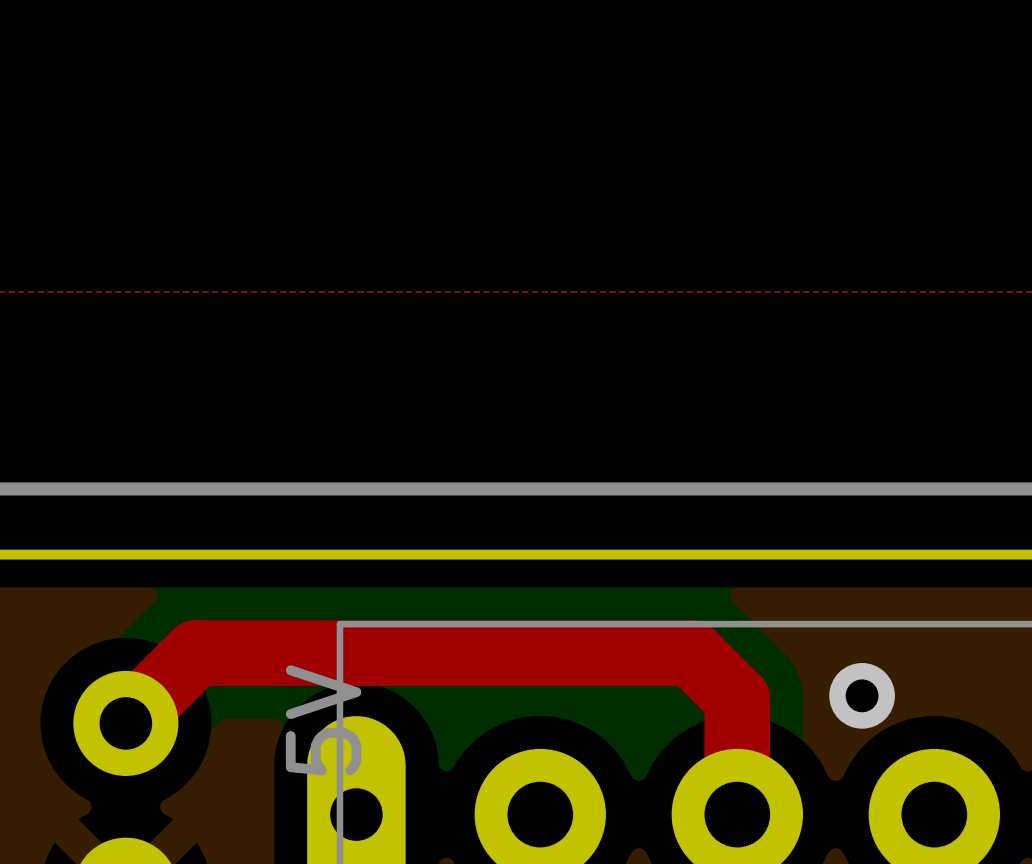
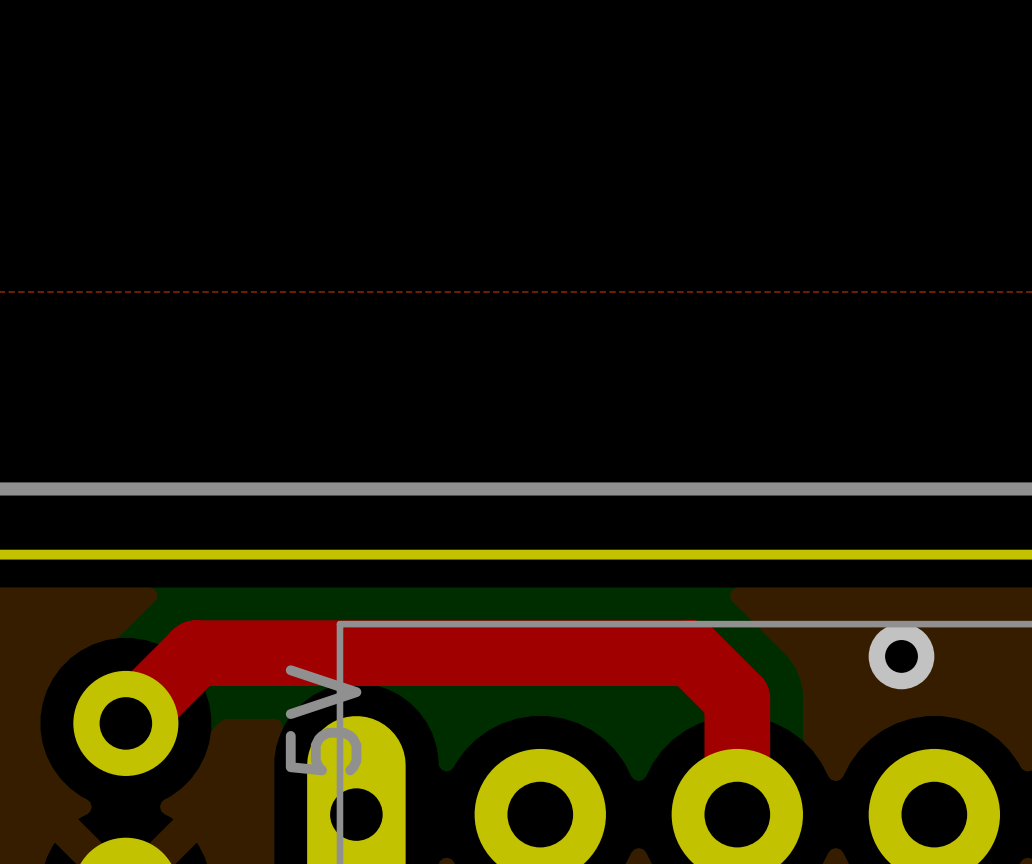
via position: (862, 695) -> (901, 656)

